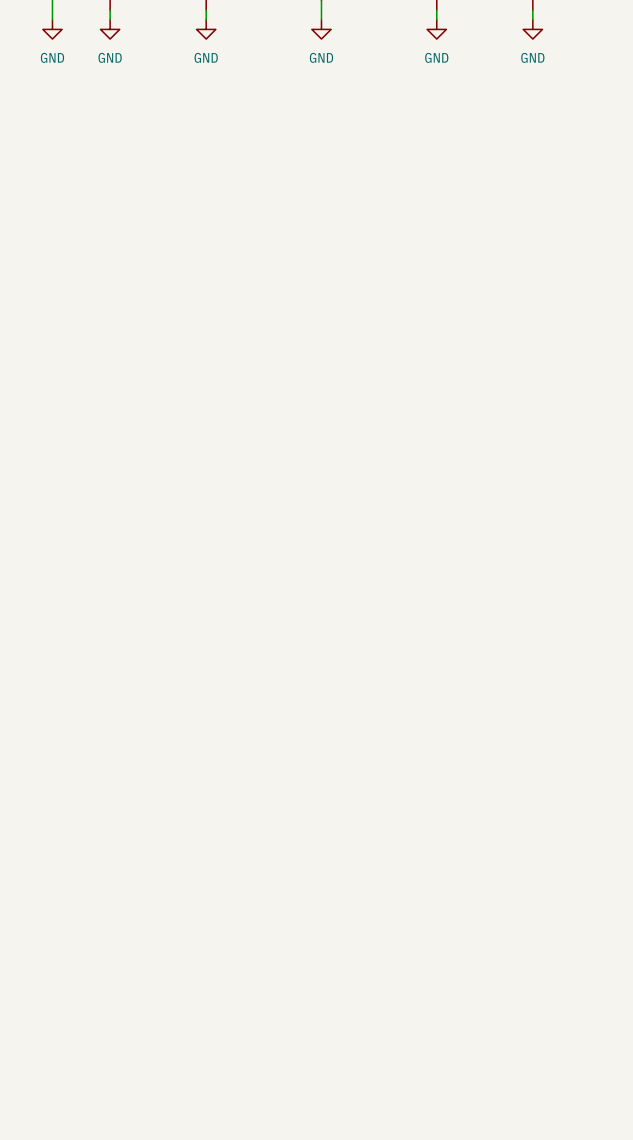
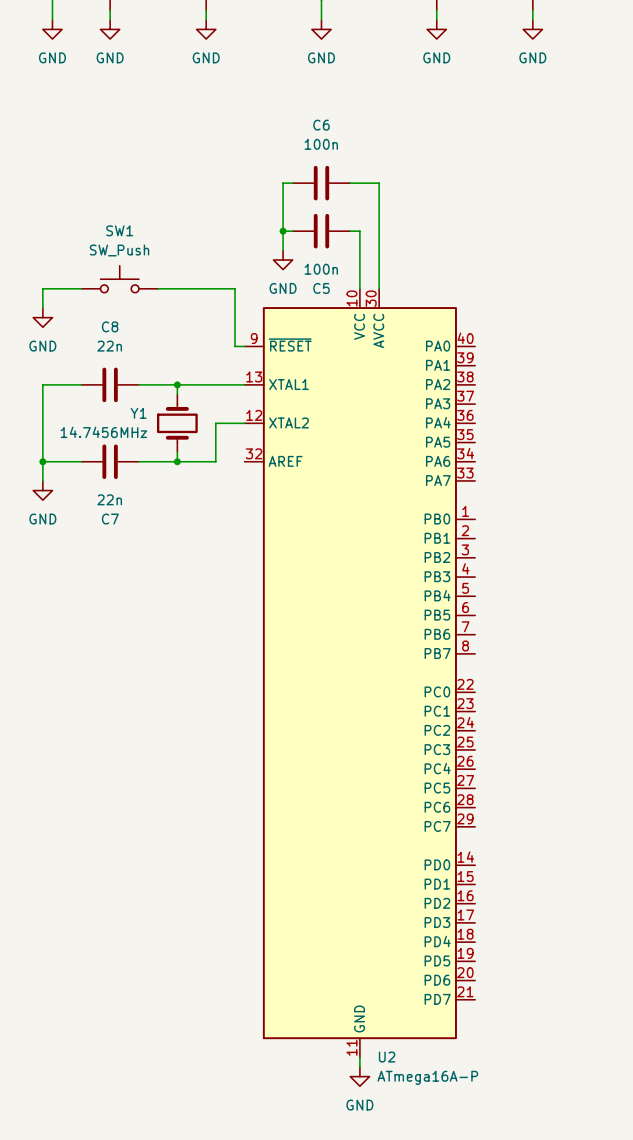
wire: none -> (292, 183) (283, 183) (283, 250)
C6: none -> 100n (321, 183)
wire: none -> (350, 183) (379, 183) (379, 288)
wire: none -> (283, 231) (292, 231)
junction: none -> (283, 231)
C5: none -> 100n (321, 231)
wire: none -> (350, 231) (359, 231) (359, 288)
power symbol: none -> GND (283, 260)
SW1: none -> SW_Push (119, 279)
wire: none -> (81, 288) (42, 288) (42, 308)
wire: none -> (158, 288) (235, 288) (235, 346) (244, 346)
power symbol: none -> GND (42, 317)
wire: none -> (81, 384) (42, 384) (42, 480)
C8: none -> 22n (110, 384)
wire: none -> (138, 384) (244, 384)
wire: none -> (177, 384) (177, 394)
junction: none -> (177, 384)
Y1: none -> 14.7456MHz (177, 423)
wire: none -> (244, 423) (215, 423) (215, 461) (138, 461)
wire: none -> (177, 452) (177, 461)
wire: none -> (42, 461) (81, 461)
junction: none -> (42, 461)
C7: none -> 22n (110, 461)
junction: none -> (177, 461)
power symbol: none -> GND (42, 490)
U2: none -> ATmega16A-P (359, 673)
wire: none -> (359, 1057) (359, 1067)
power symbol: none -> GND (359, 1076)

